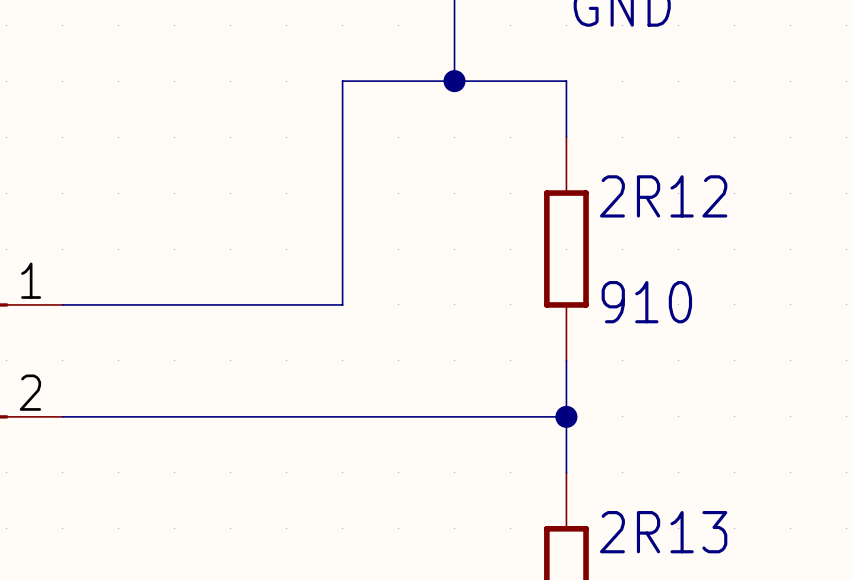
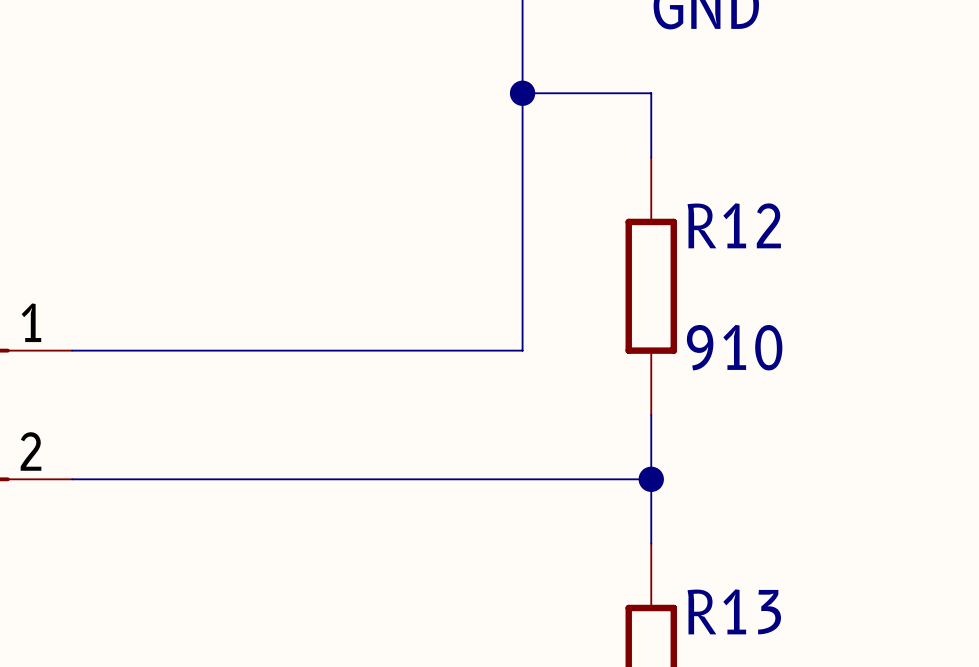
wire: (454, 81) (342, 81) (342, 304) -> (522, 93) (522, 350) (393, 350)
2R12 name: 2R12 (663, 196) -> R12 (734, 225)
2R13 name: 2R13 (663, 532) -> R13 (734, 611)

